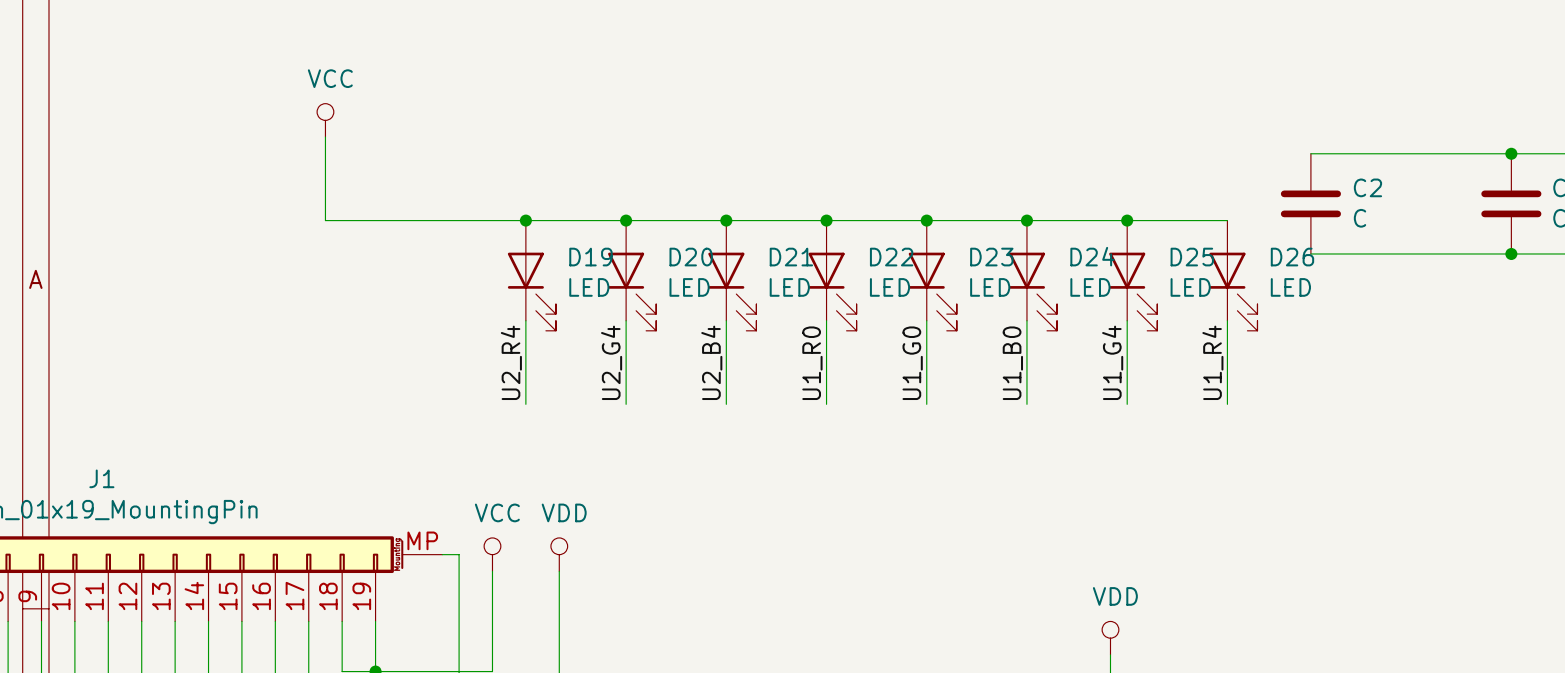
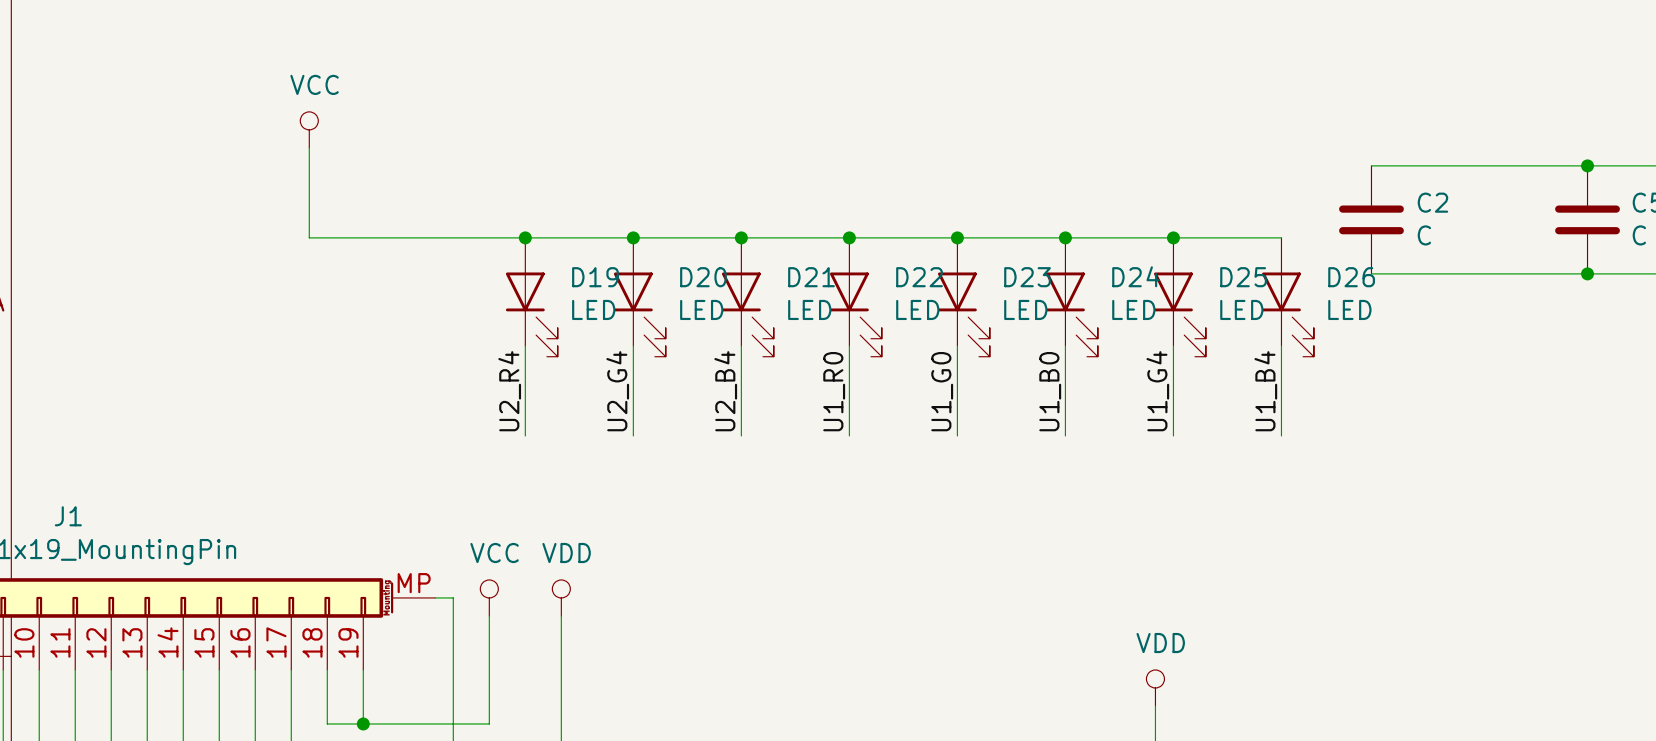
label: U1_R4 (1212, 362) -> U1_B4 (1265, 391)

